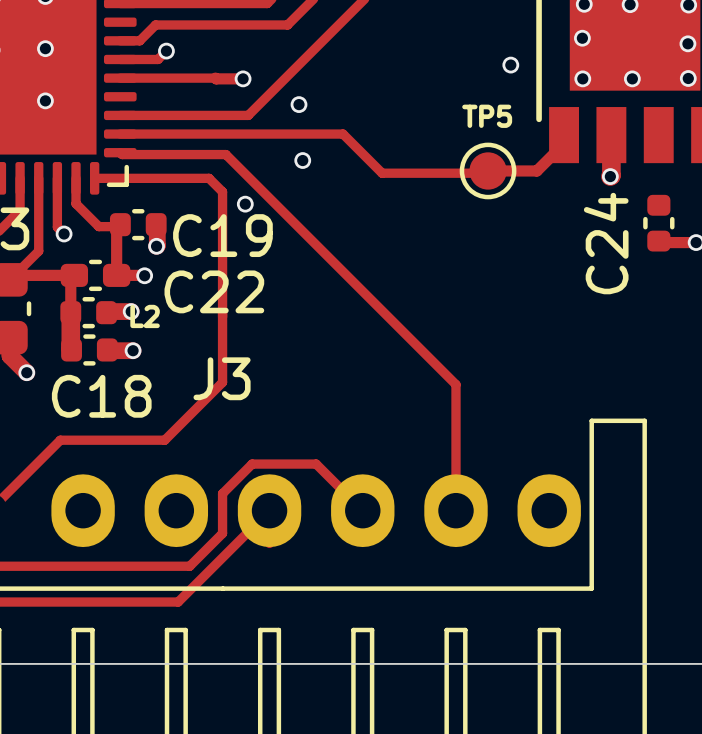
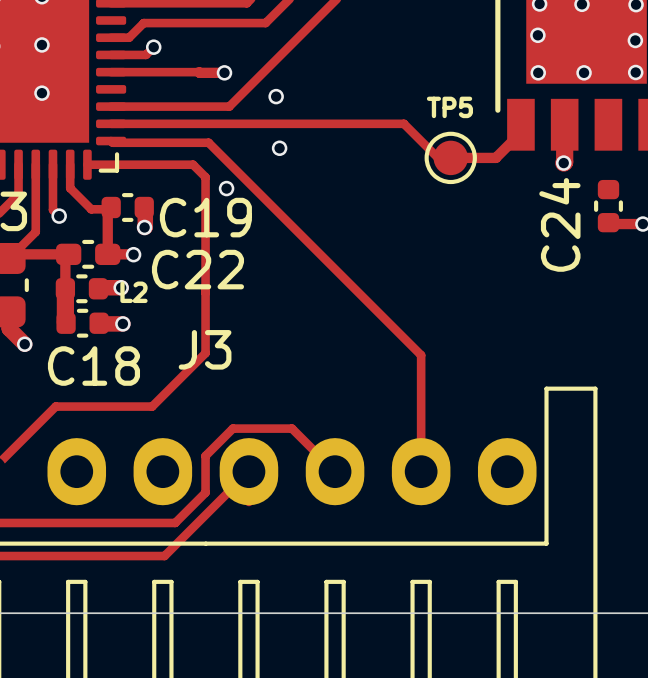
via: (510, 65) -> none
track: (343, 134) (382, 173) (476, 173) -> (316, 123) (403, 123) (440, 159)

